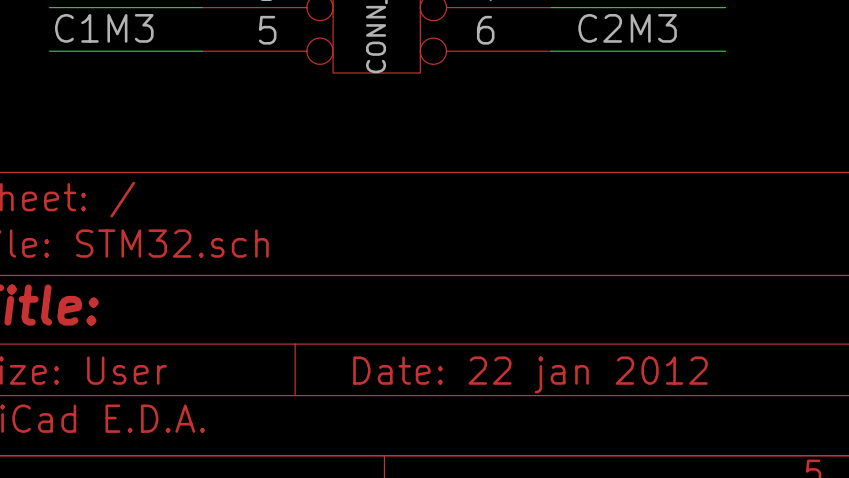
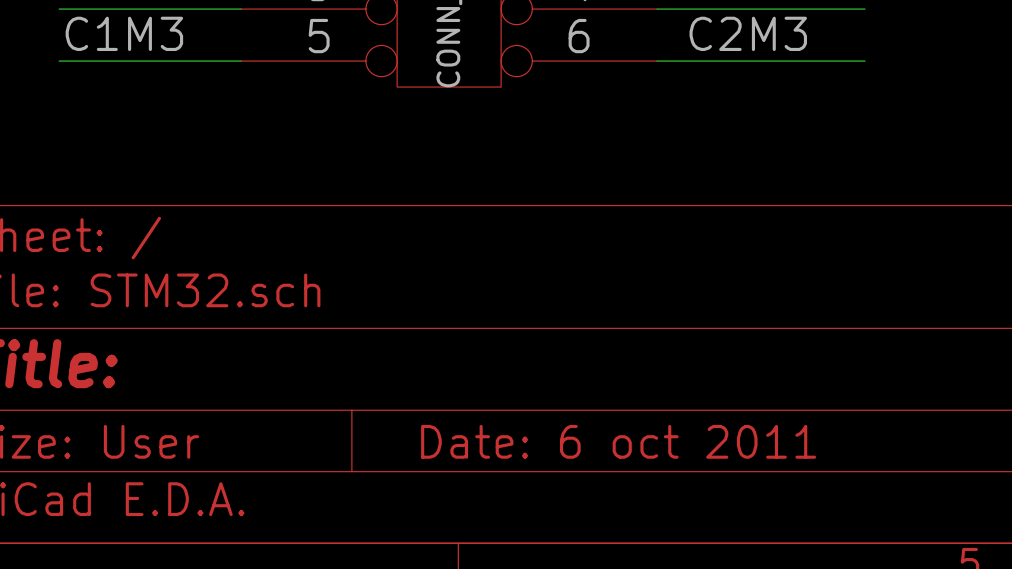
title block: Date: 22 jan 2012 (530, 374) -> Date: 6 oct 2011 (618, 441)

